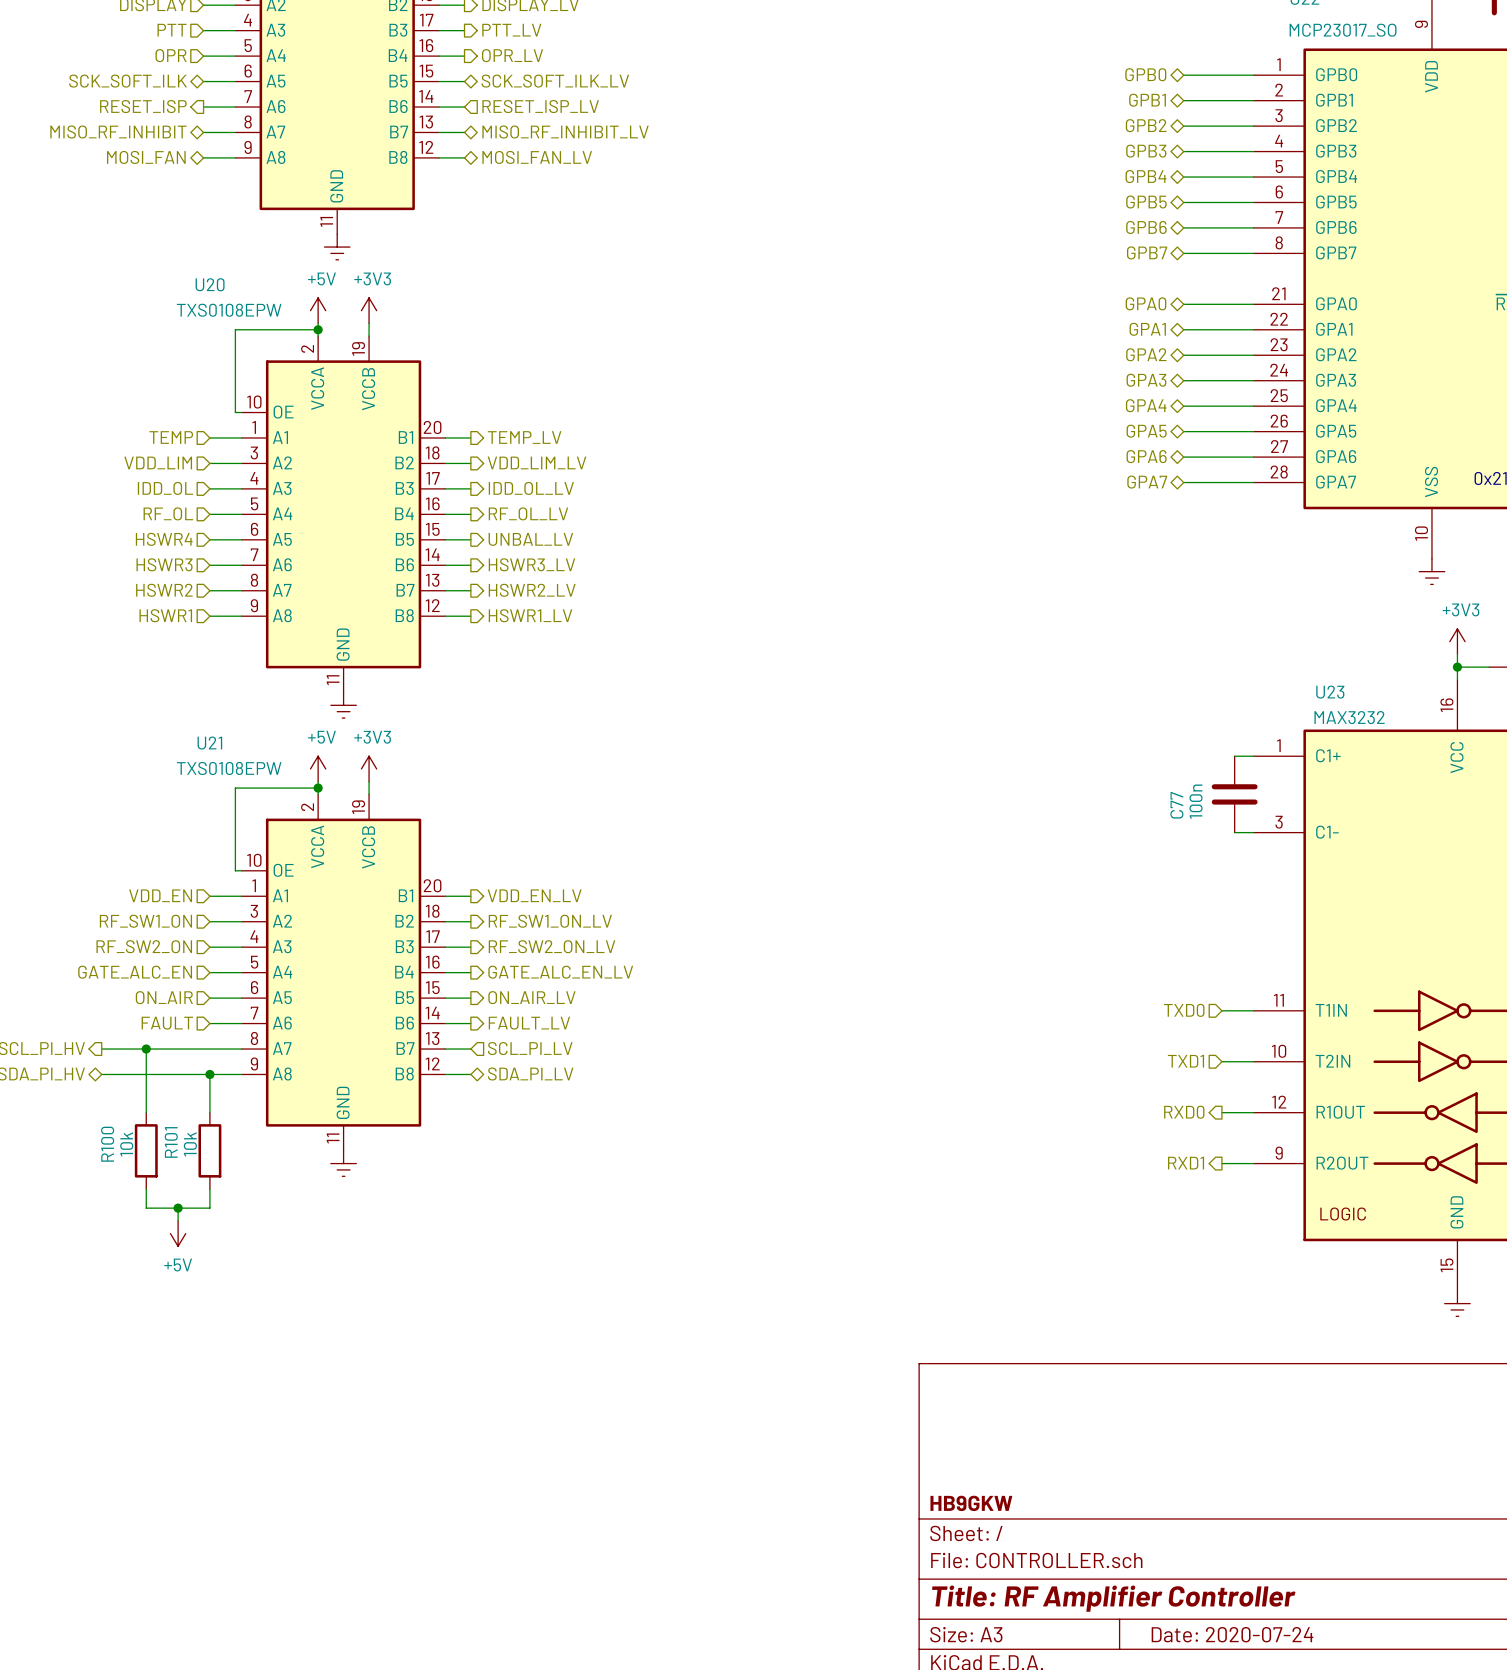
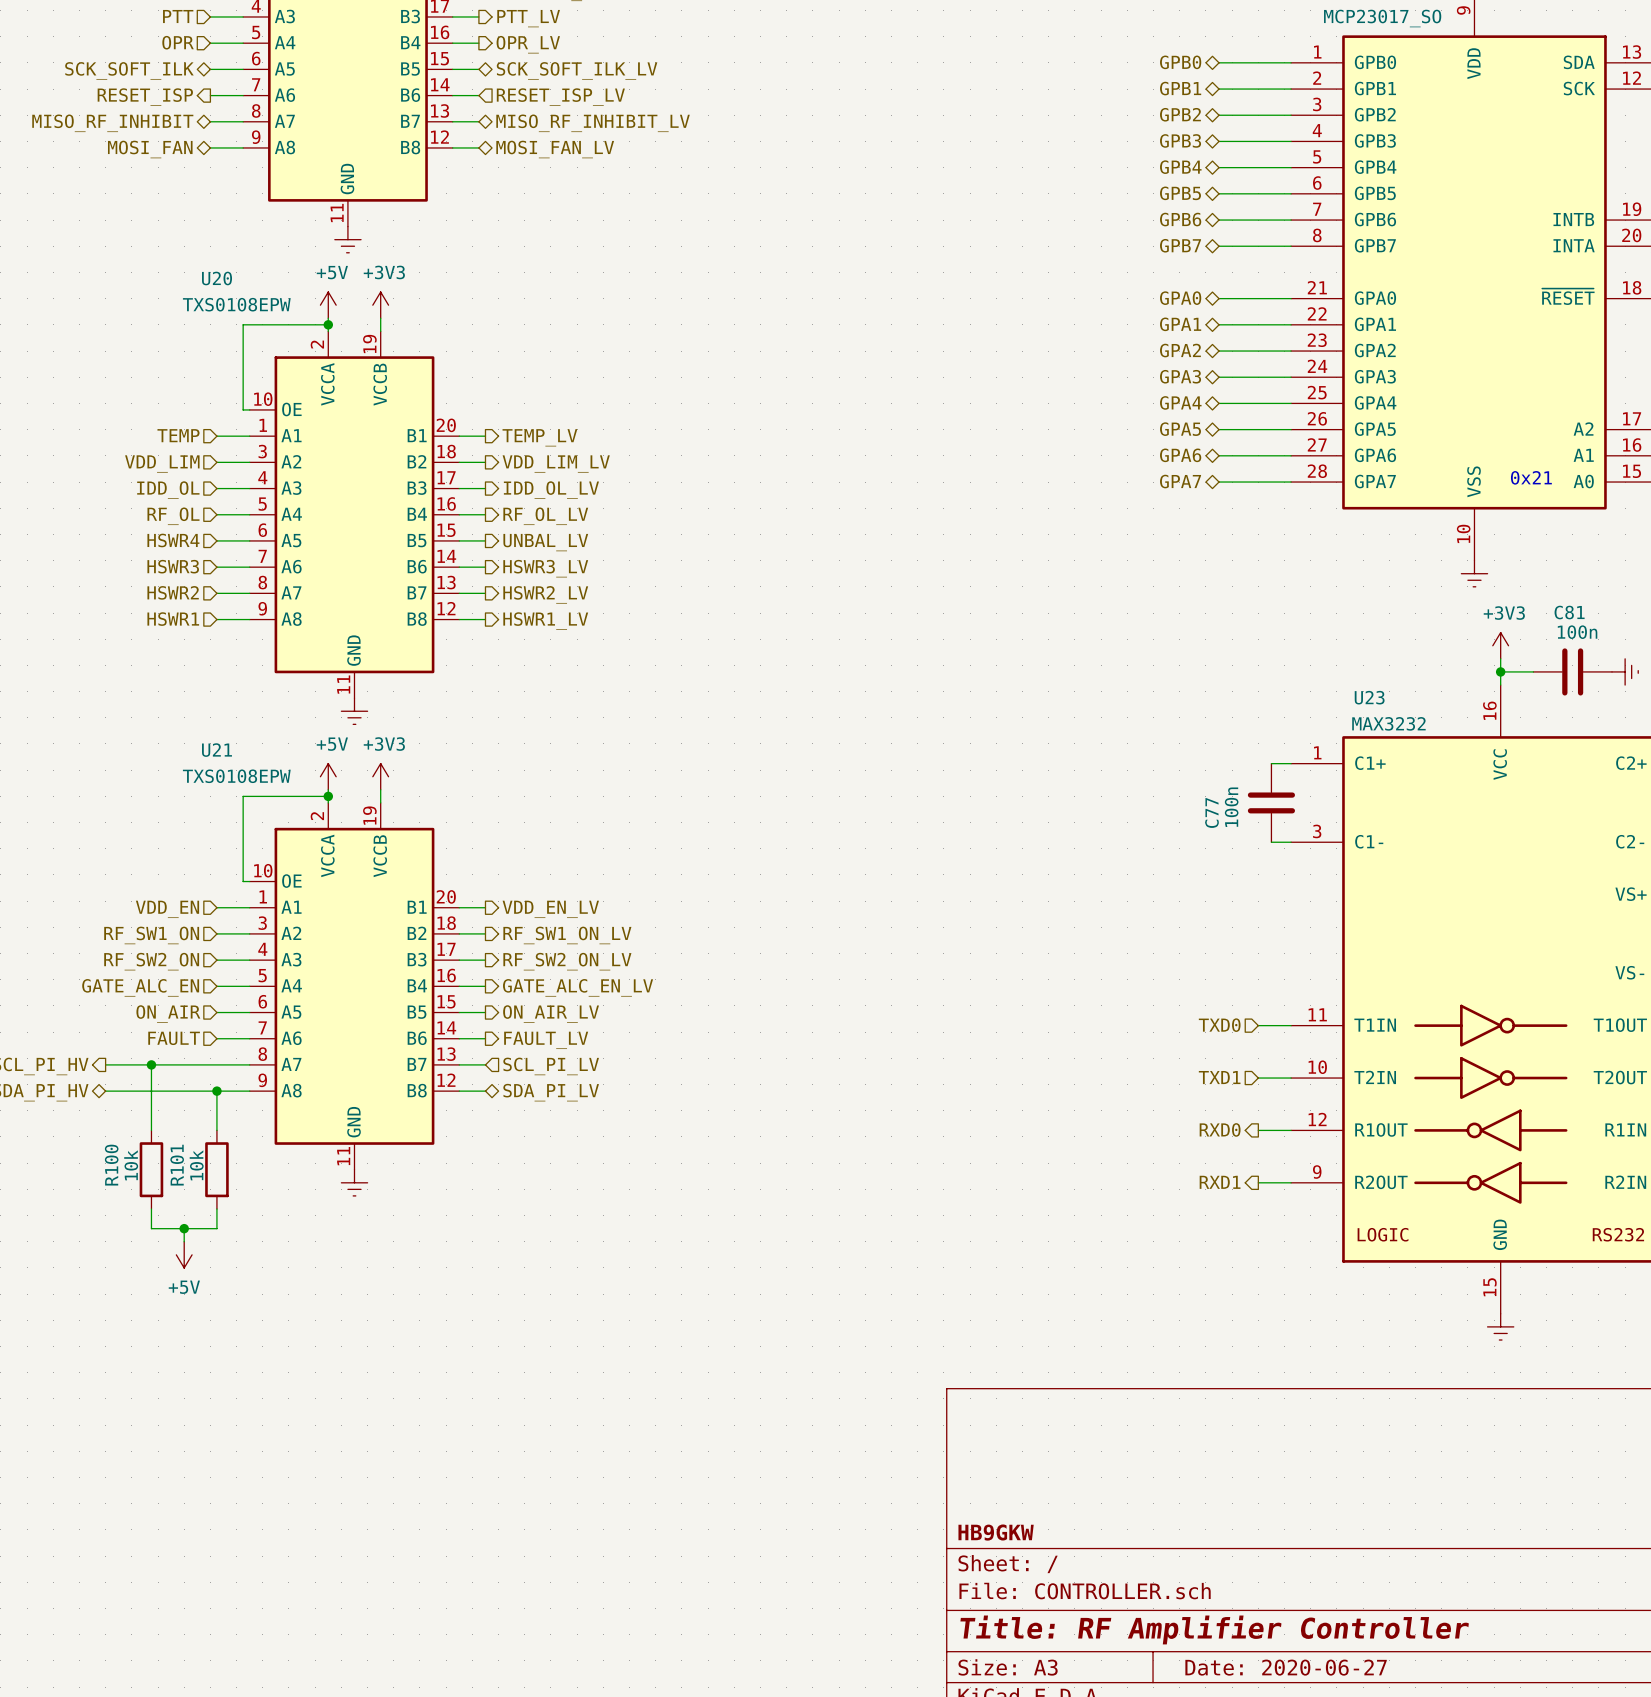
title block: Date: 2020-07-24 (1232, 1634) -> Date: 2020-06-27 (1286, 1667)

